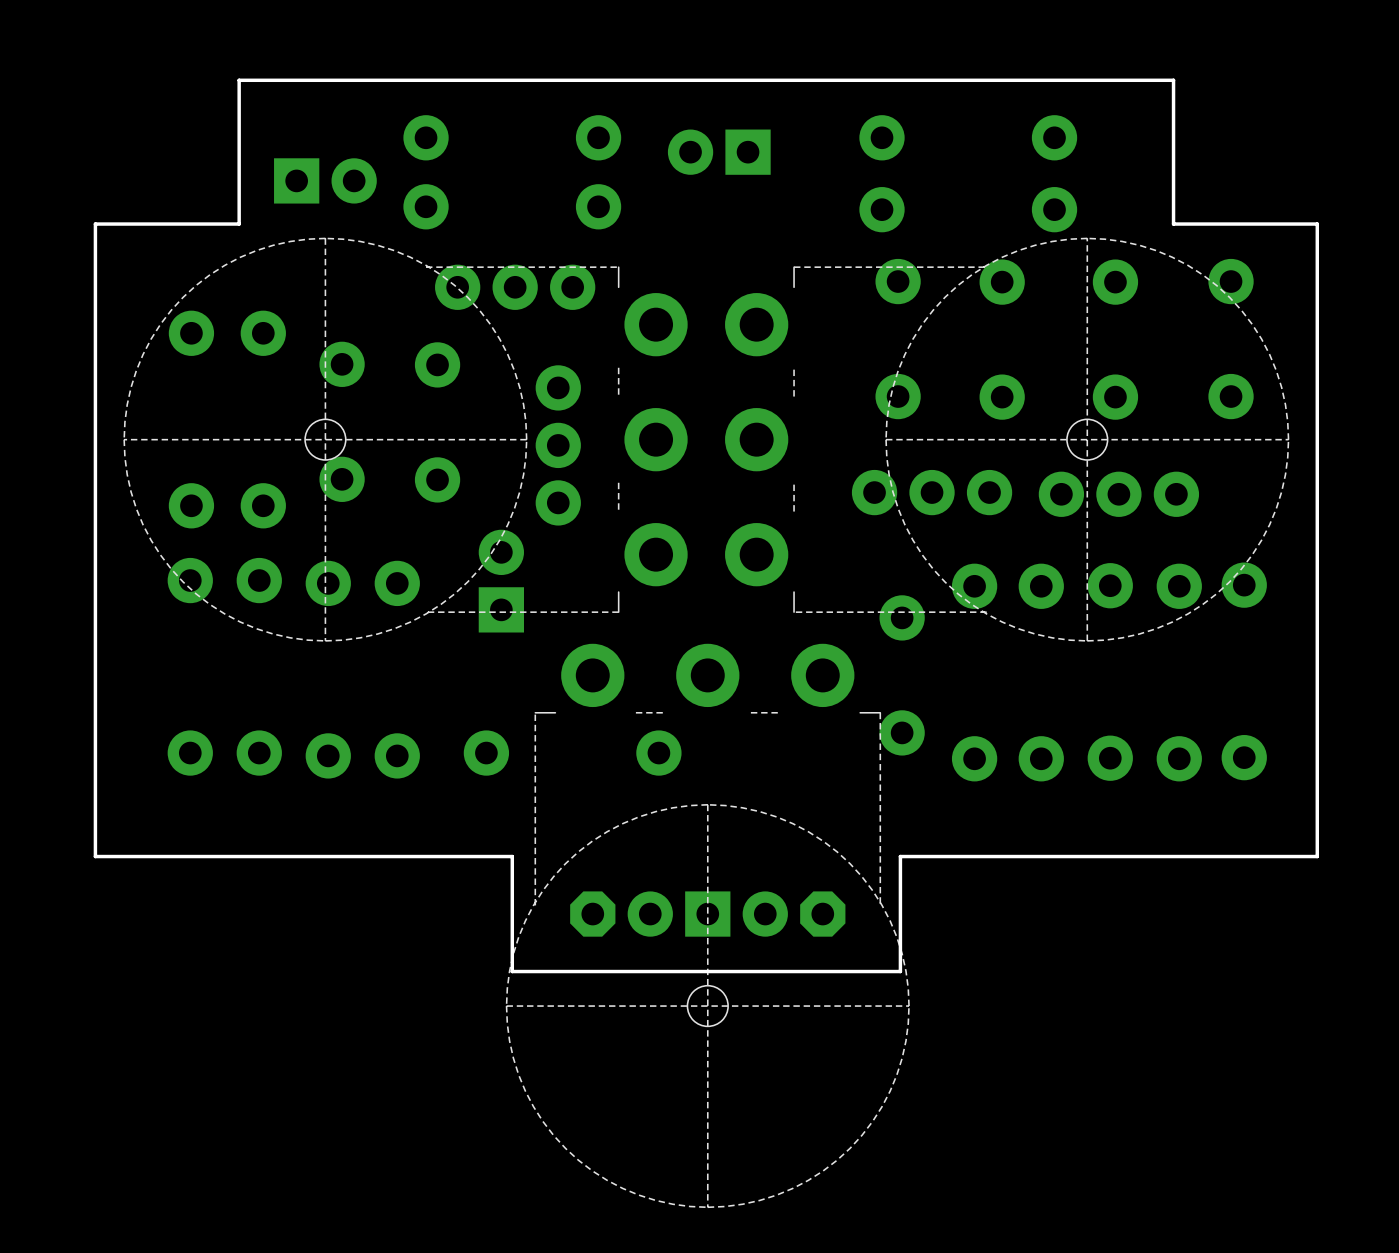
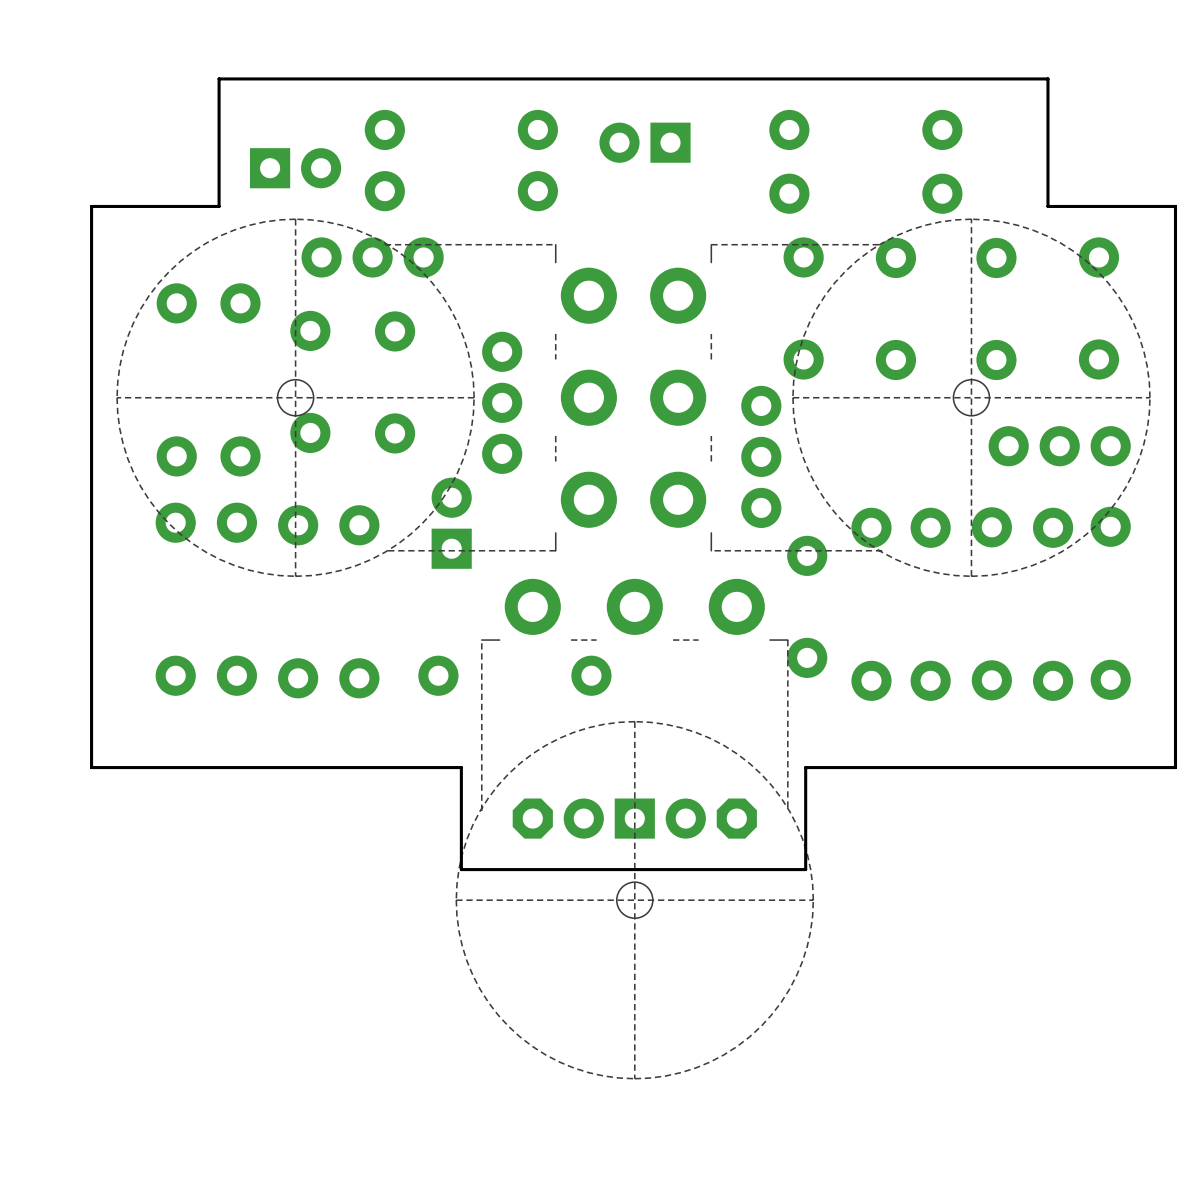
part position: (515, 287) -> (372, 257)
part rotation: 0° (932, 492) -> 90° clockwise (761, 456)
part position: (1118, 494) -> (1059, 446)

